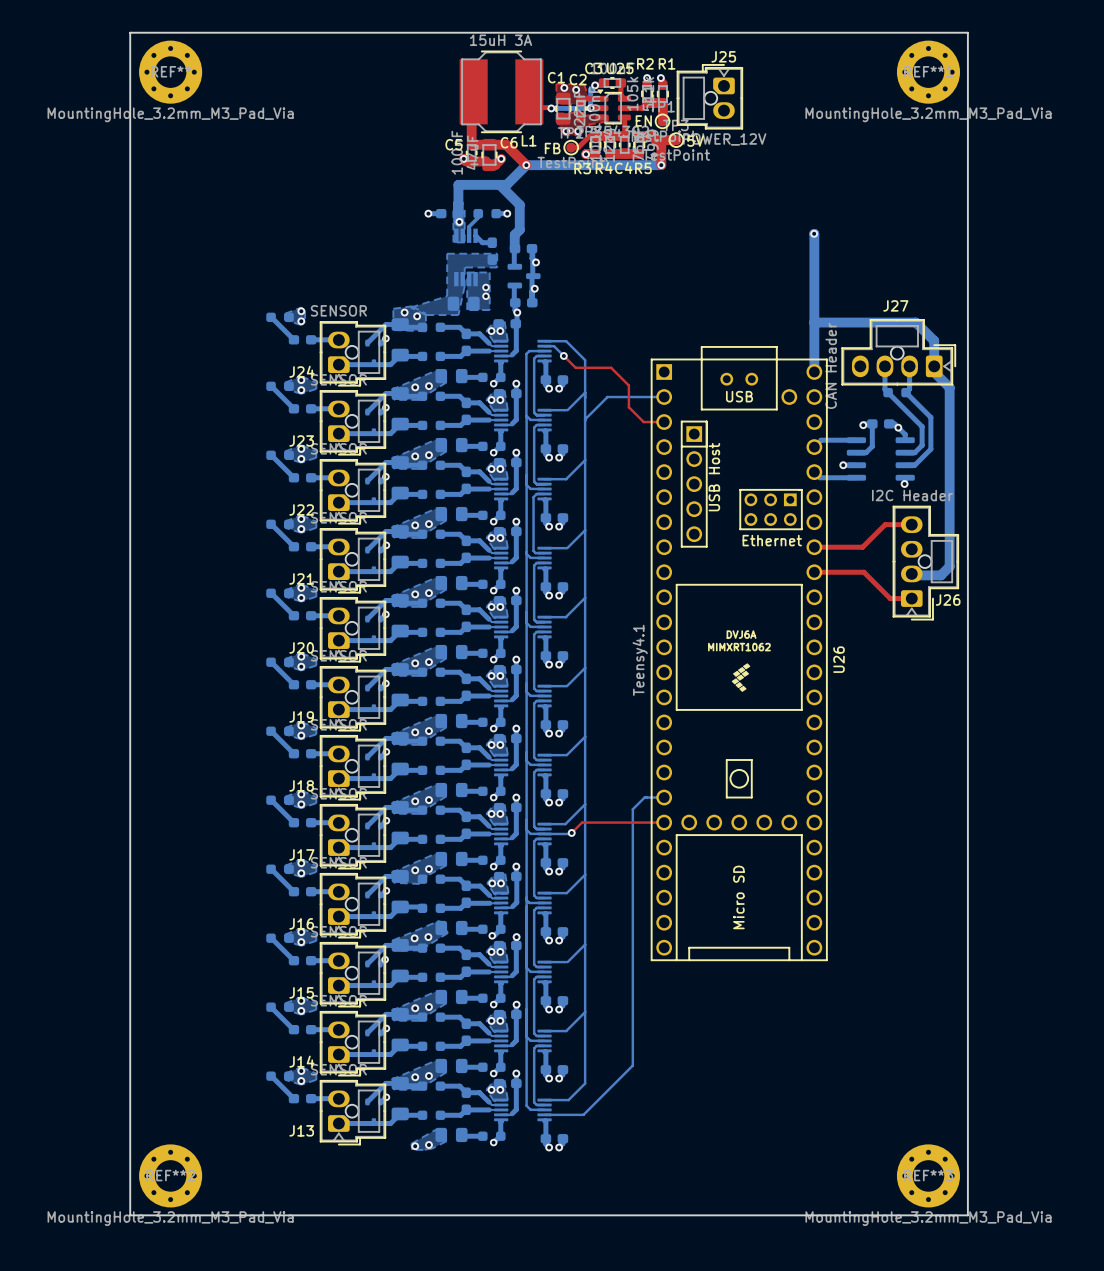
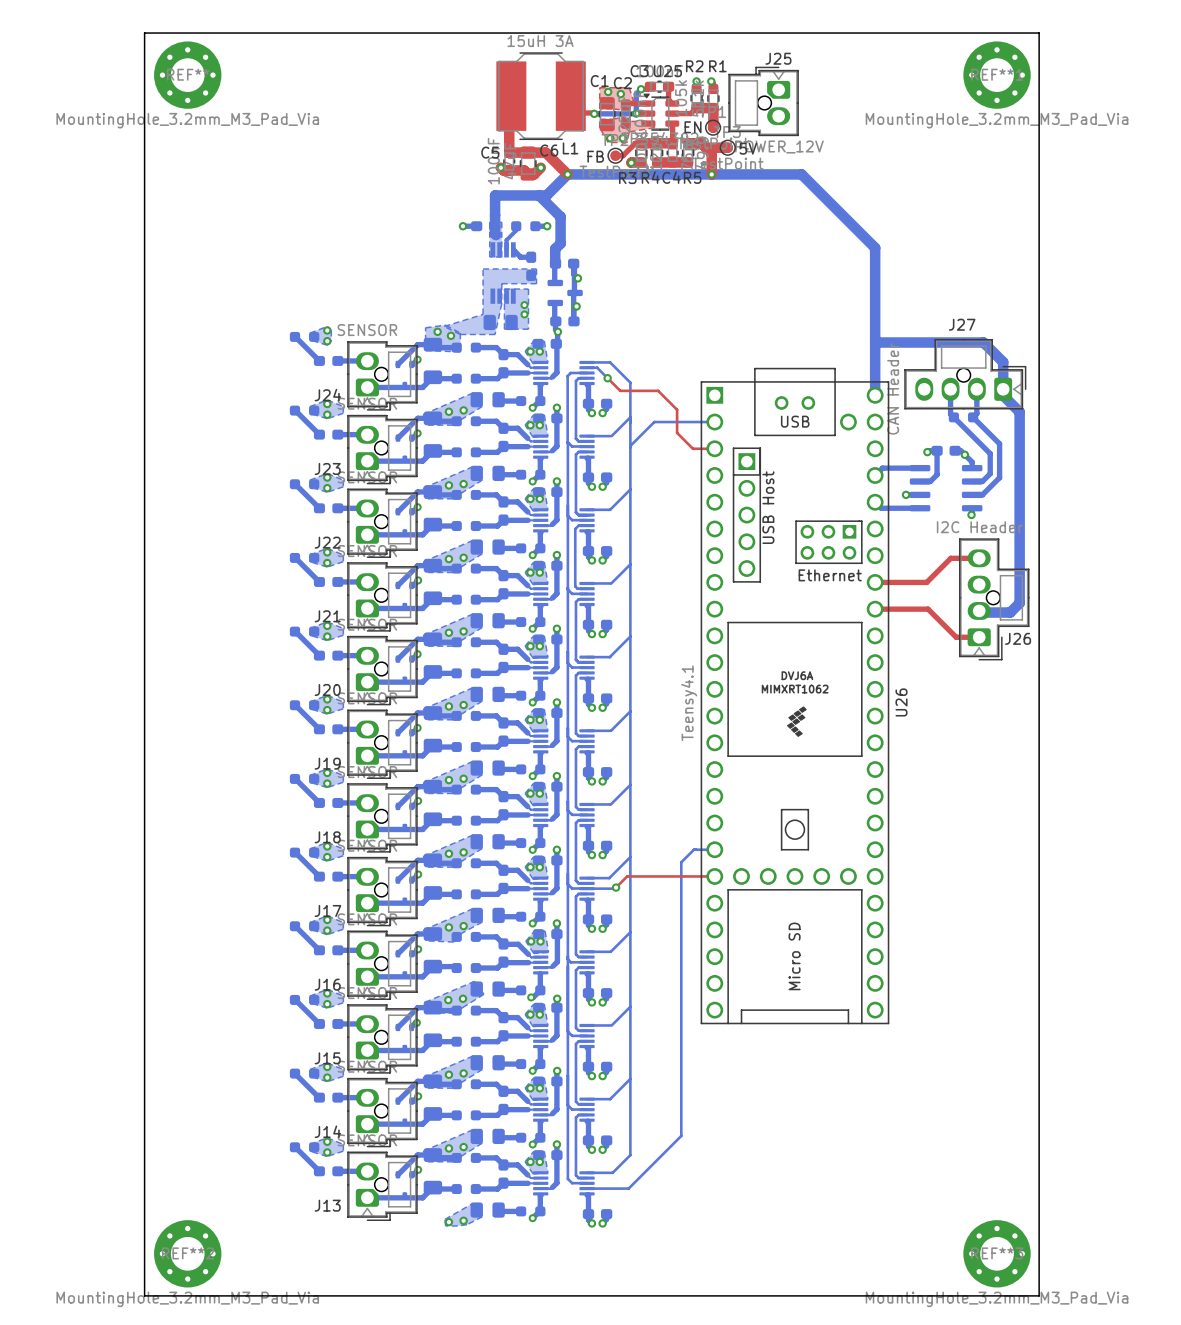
bottom track: none -> (711, 174) (801, 174) (874, 247)
via: (459, 221) -> none
via: (814, 233) -> none

